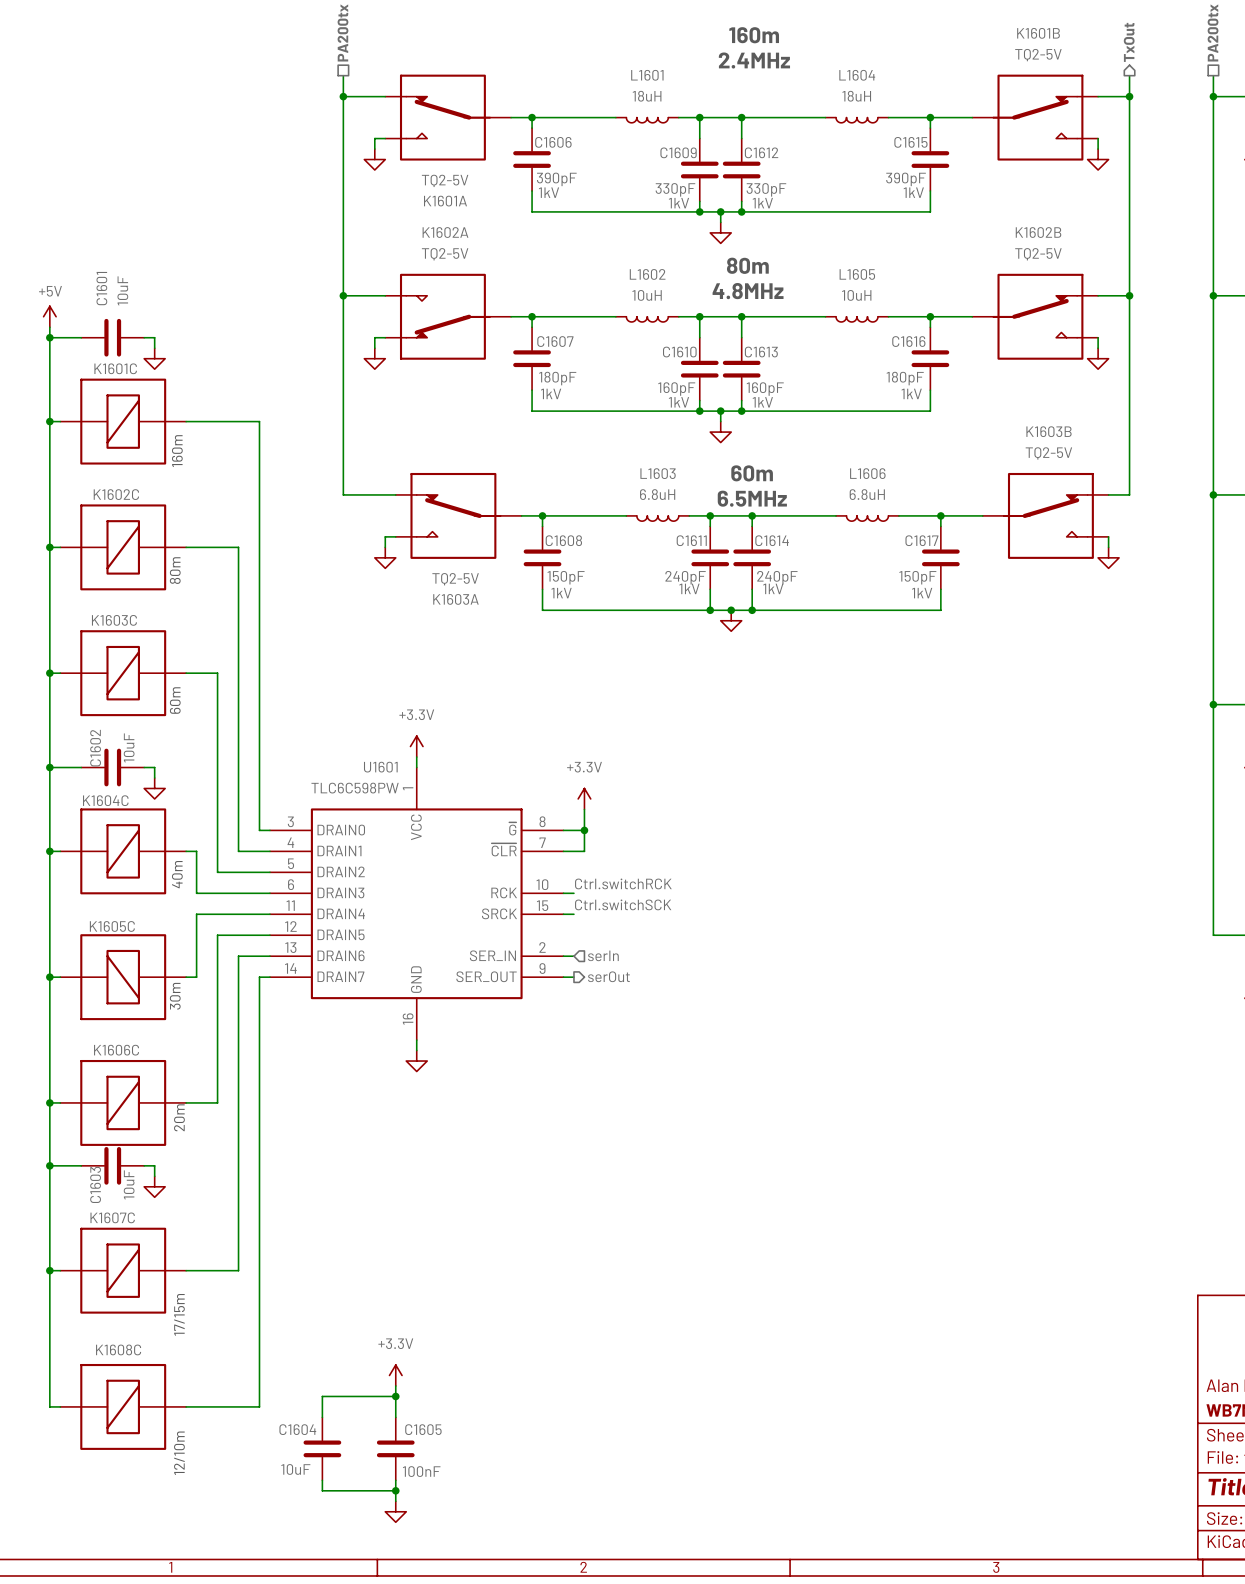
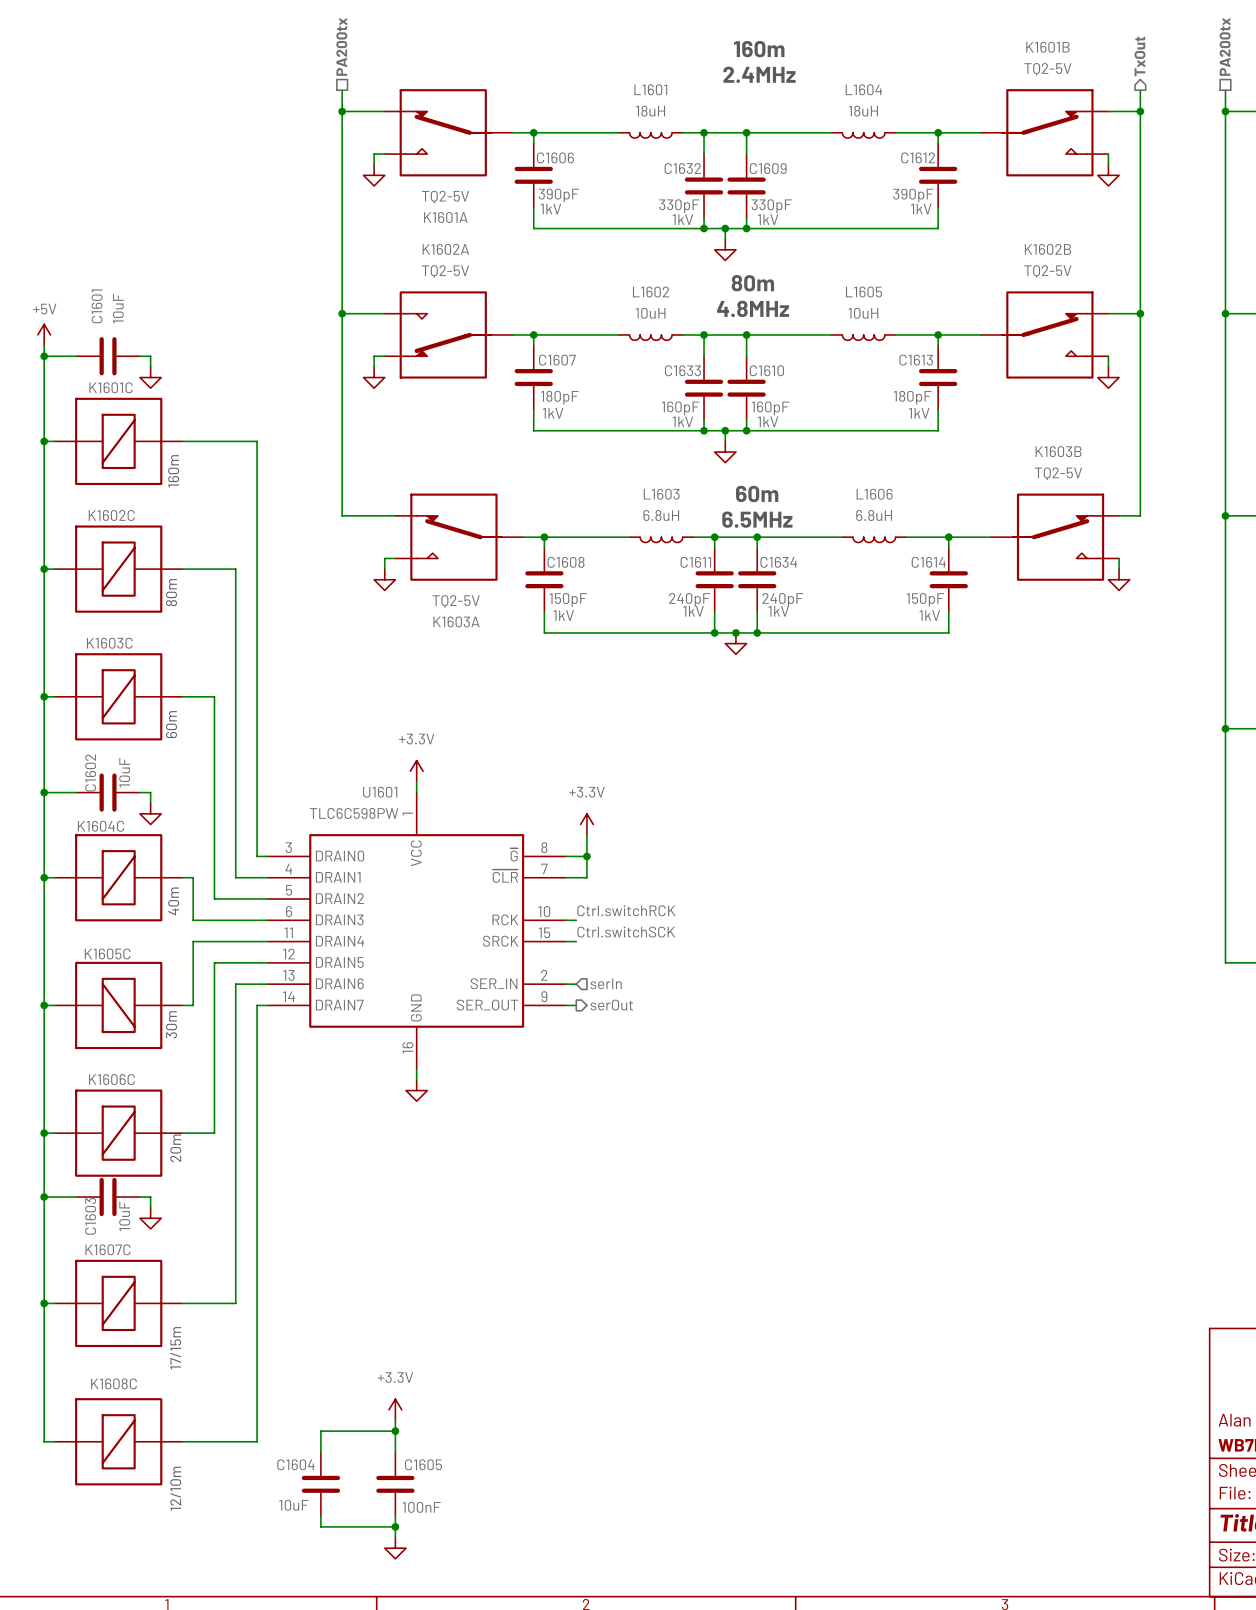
C1615 name: C1615 (910, 142) -> C1612 (918, 157)
C1609 name: C1609 (678, 152) -> C1632 (682, 168)
C1612 name: C1612 (761, 152) -> C1609 (768, 168)
C1616 name: C1616 (908, 341) -> C1613 (916, 360)
C1610 name: C1610 (679, 352) -> C1633 (682, 370)
C1613 name: C1613 (761, 352) -> C1610 (766, 370)
C1614 name: C1614 (772, 540) -> C1634 (778, 562)
C1617 name: C1617 (921, 540) -> C1614 (928, 562)

